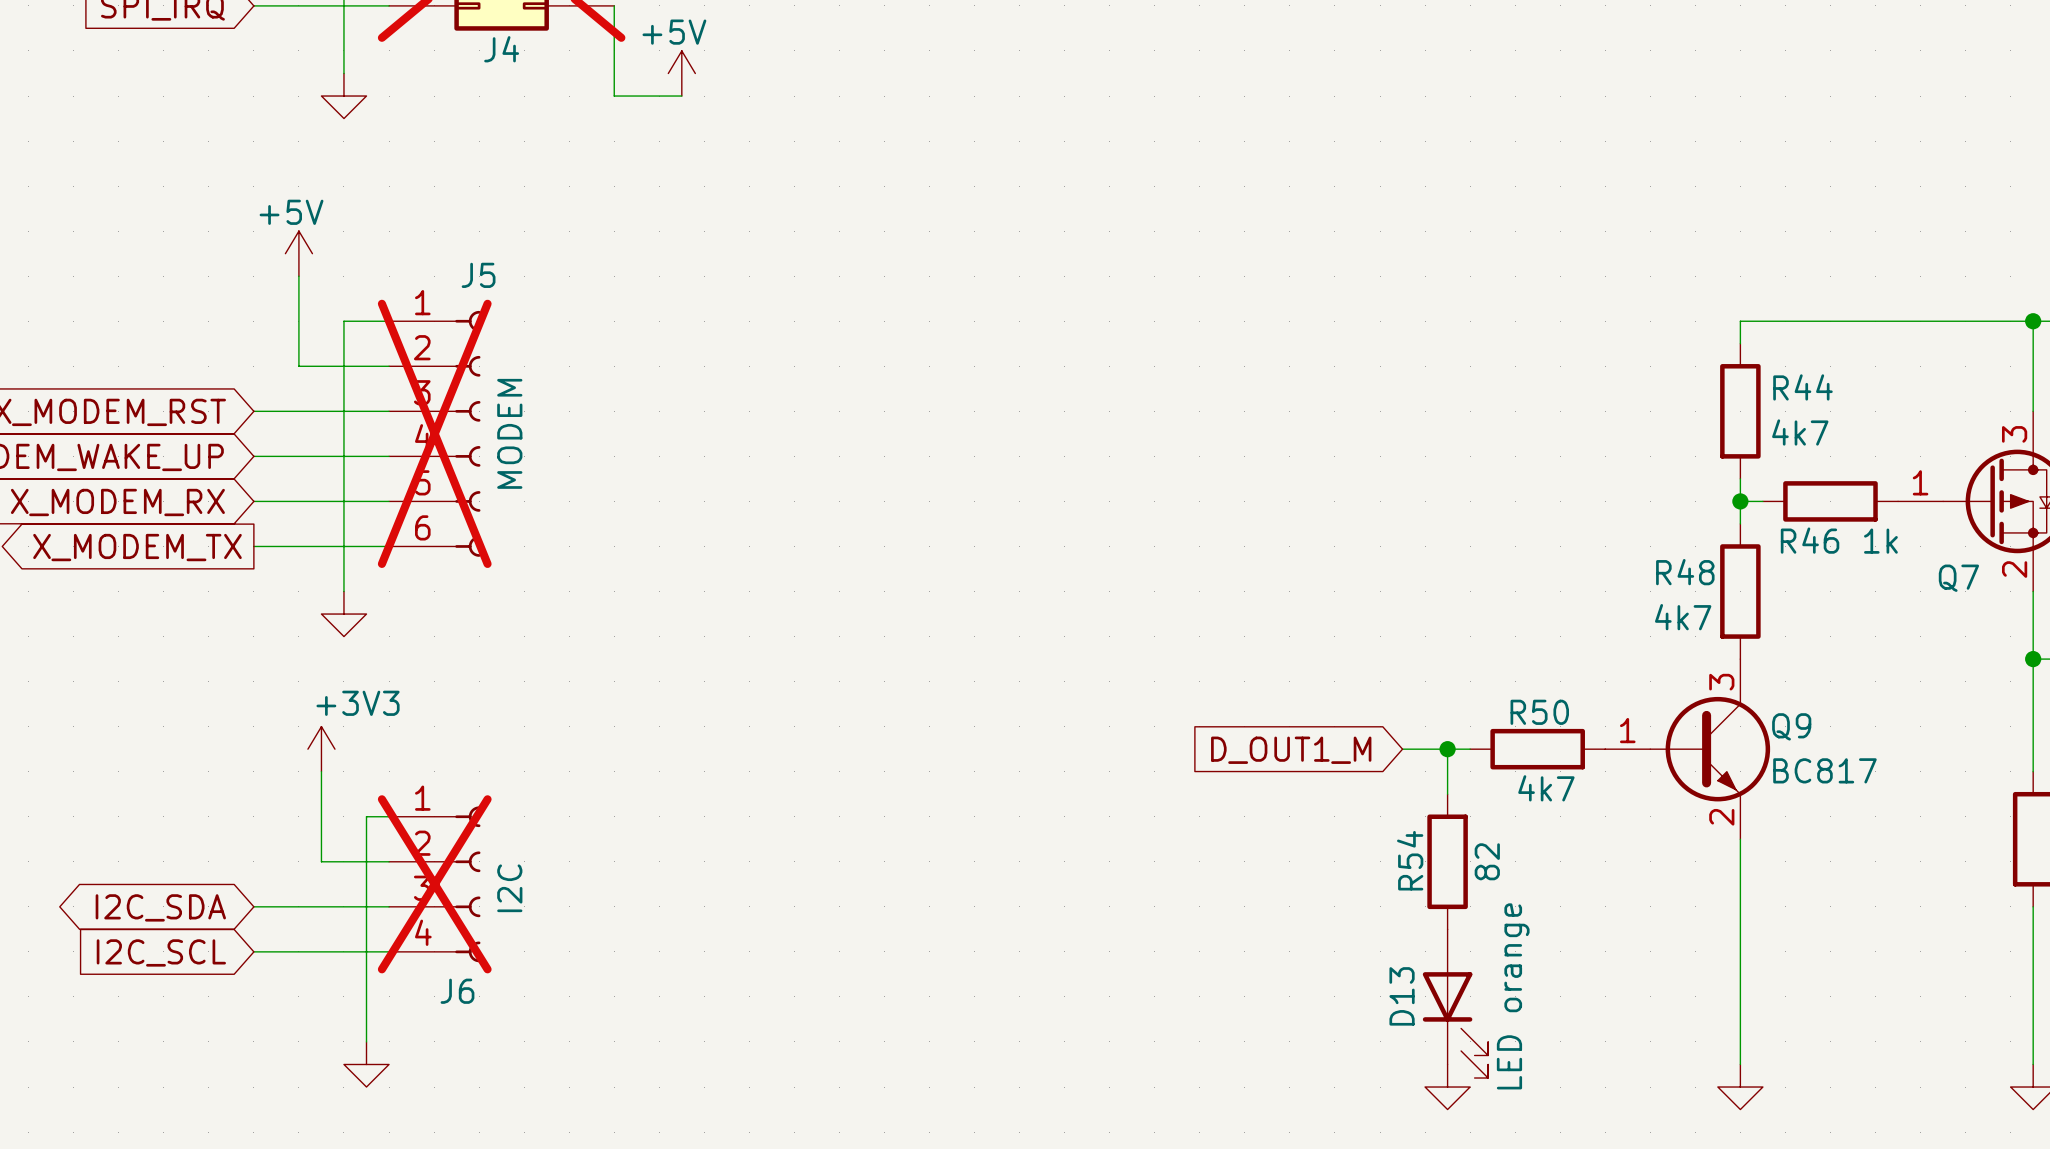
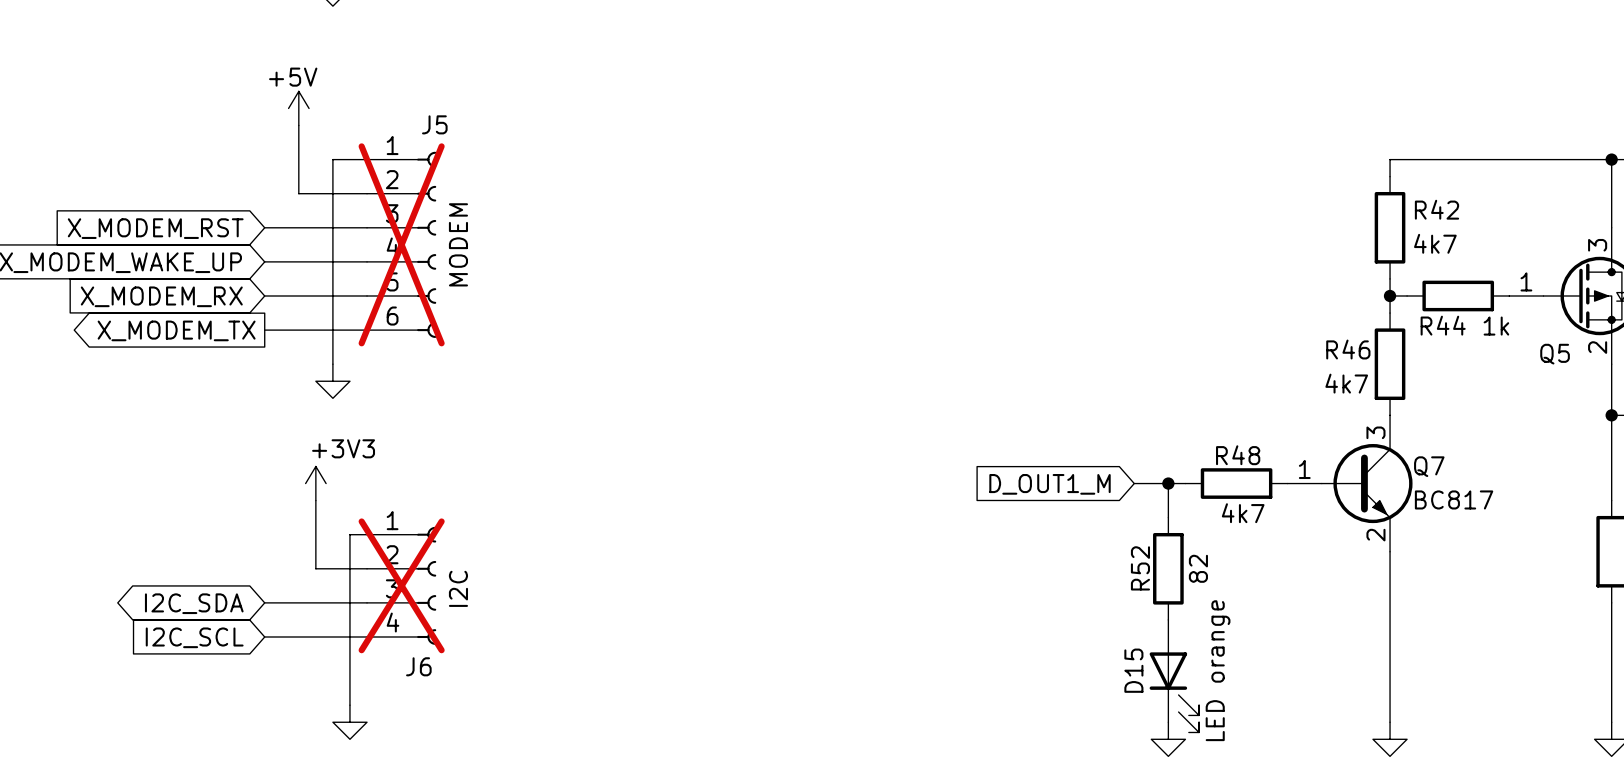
R44 name: R44 (1802, 387) -> R42 (1437, 209)
R46 name: R46 (1810, 540) -> R44 (1443, 325)
R48 name: R48 (1685, 572) -> R46 (1348, 349)
Q7 name: Q7 (1958, 578) -> Q5 (1555, 354)
R50 name: R50 (1539, 712) -> R48 (1238, 455)
Q9 name: Q9 (1791, 726) -> Q7 (1429, 466)
R54 name: R54 (1410, 860) -> R52 (1140, 568)
D13 name: D13 (1402, 996) -> D15 (1133, 670)

